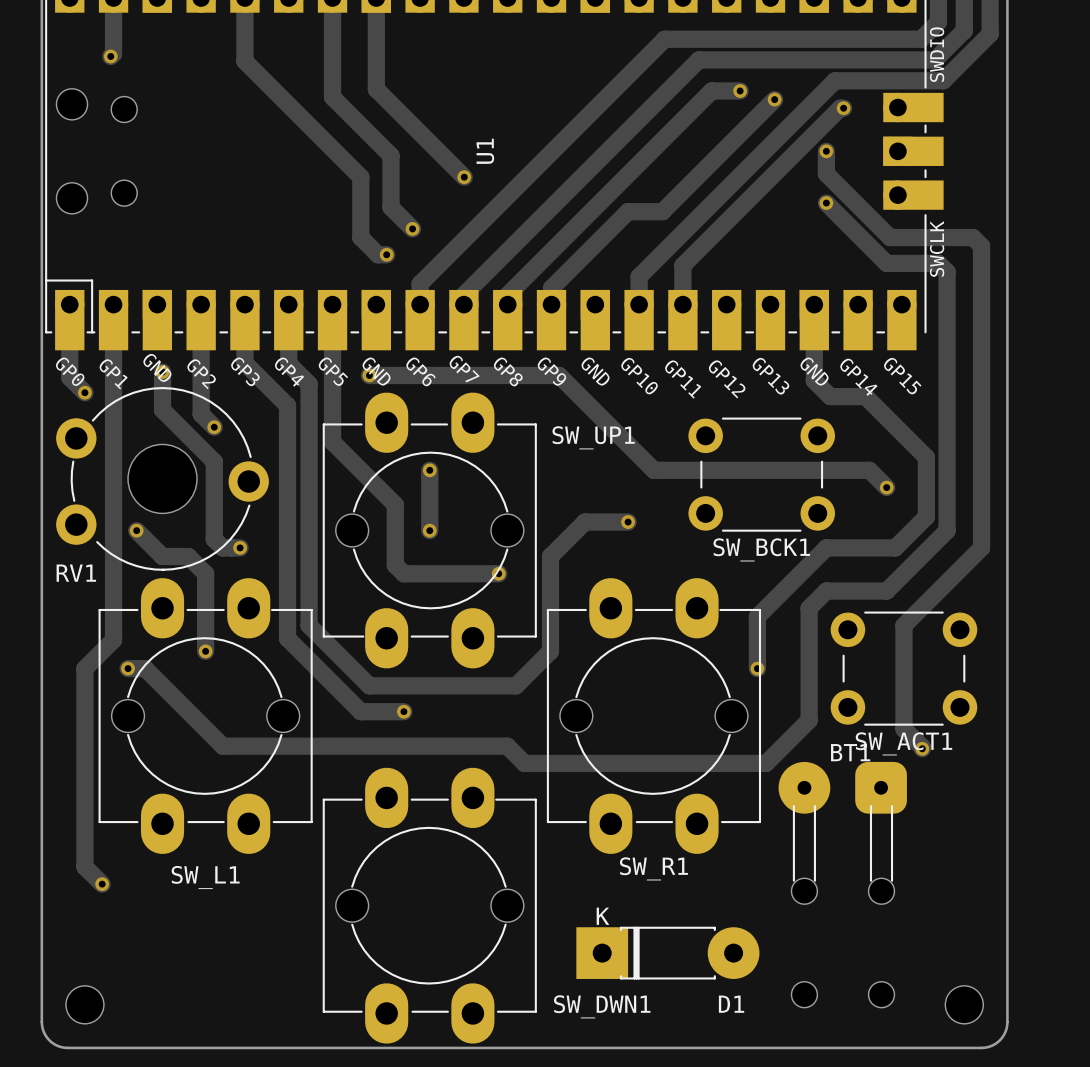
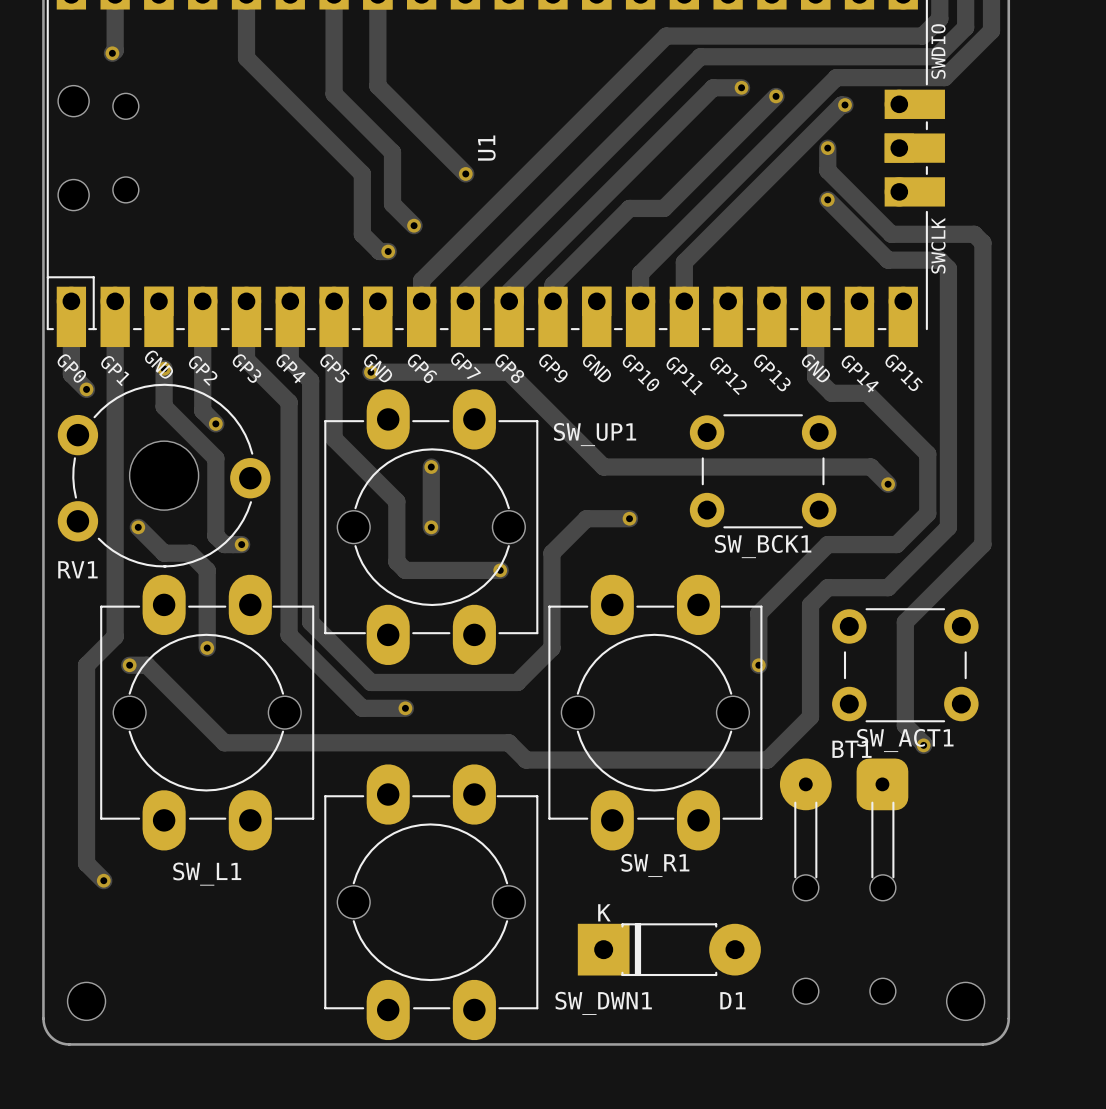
track: (507, 375) (559, 375) (653, 470) -> (508, 372) (603, 467) (655, 467)

